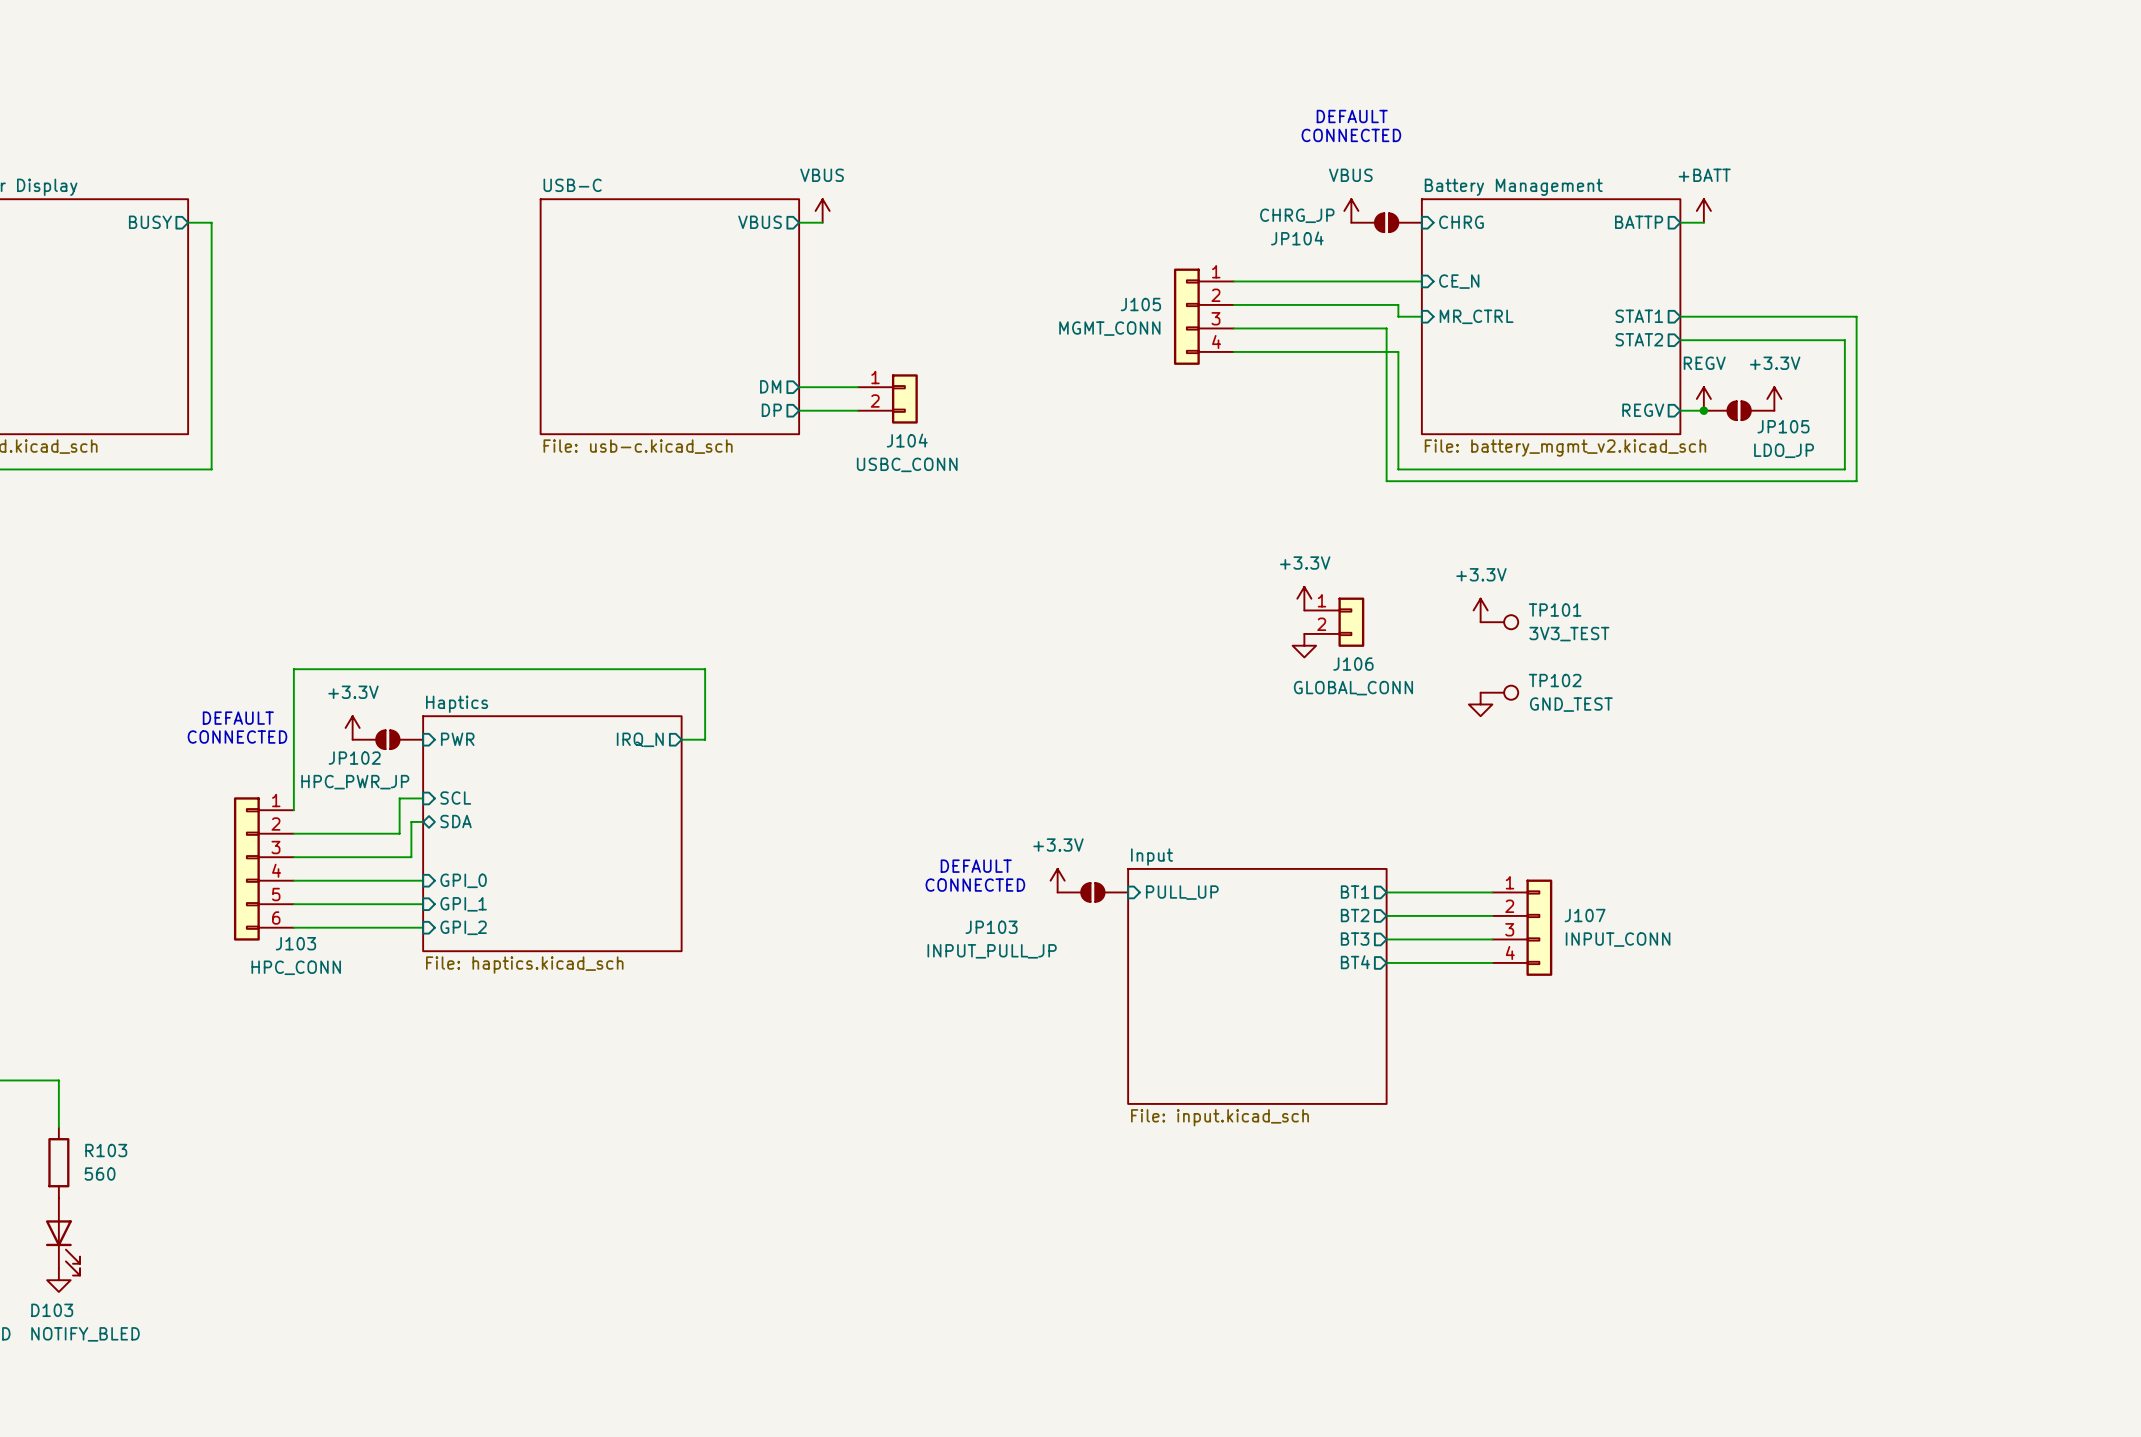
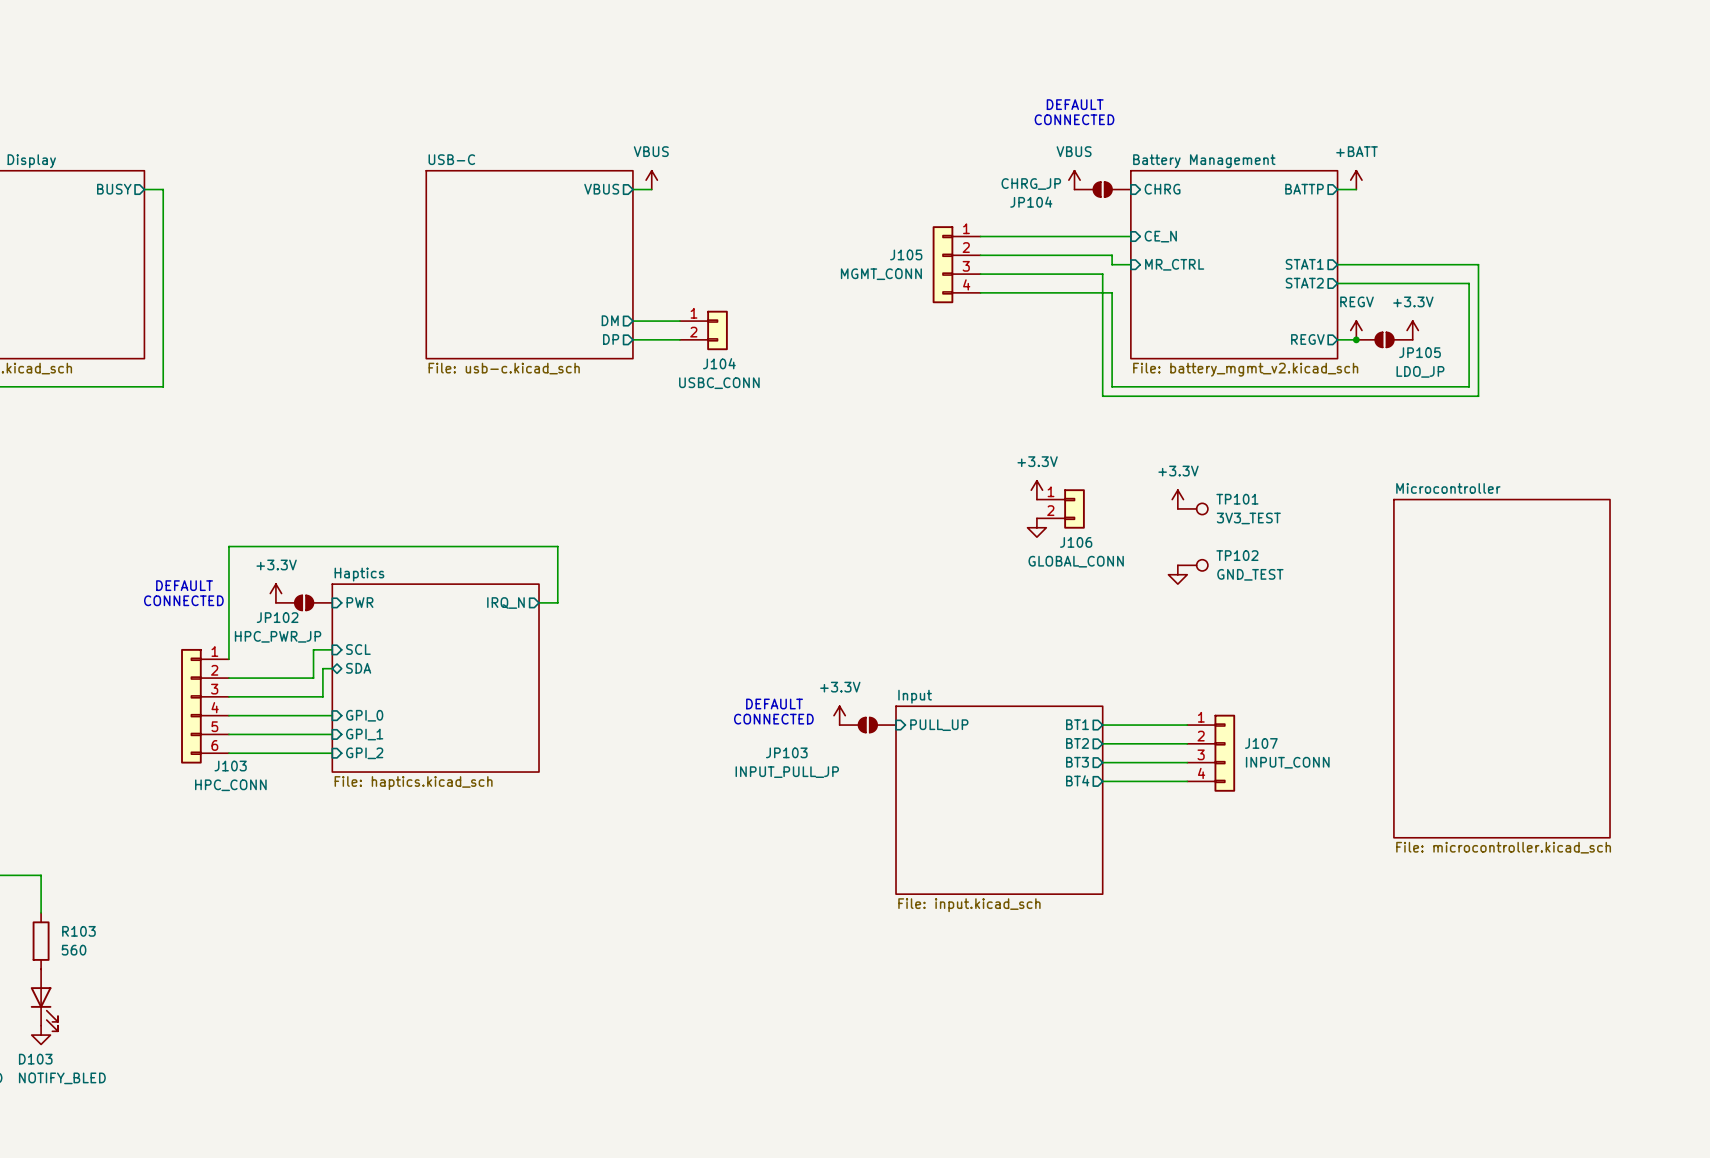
sheet Microcontroller: none -> File: microcontroller.kicad_sch (1501, 668)

